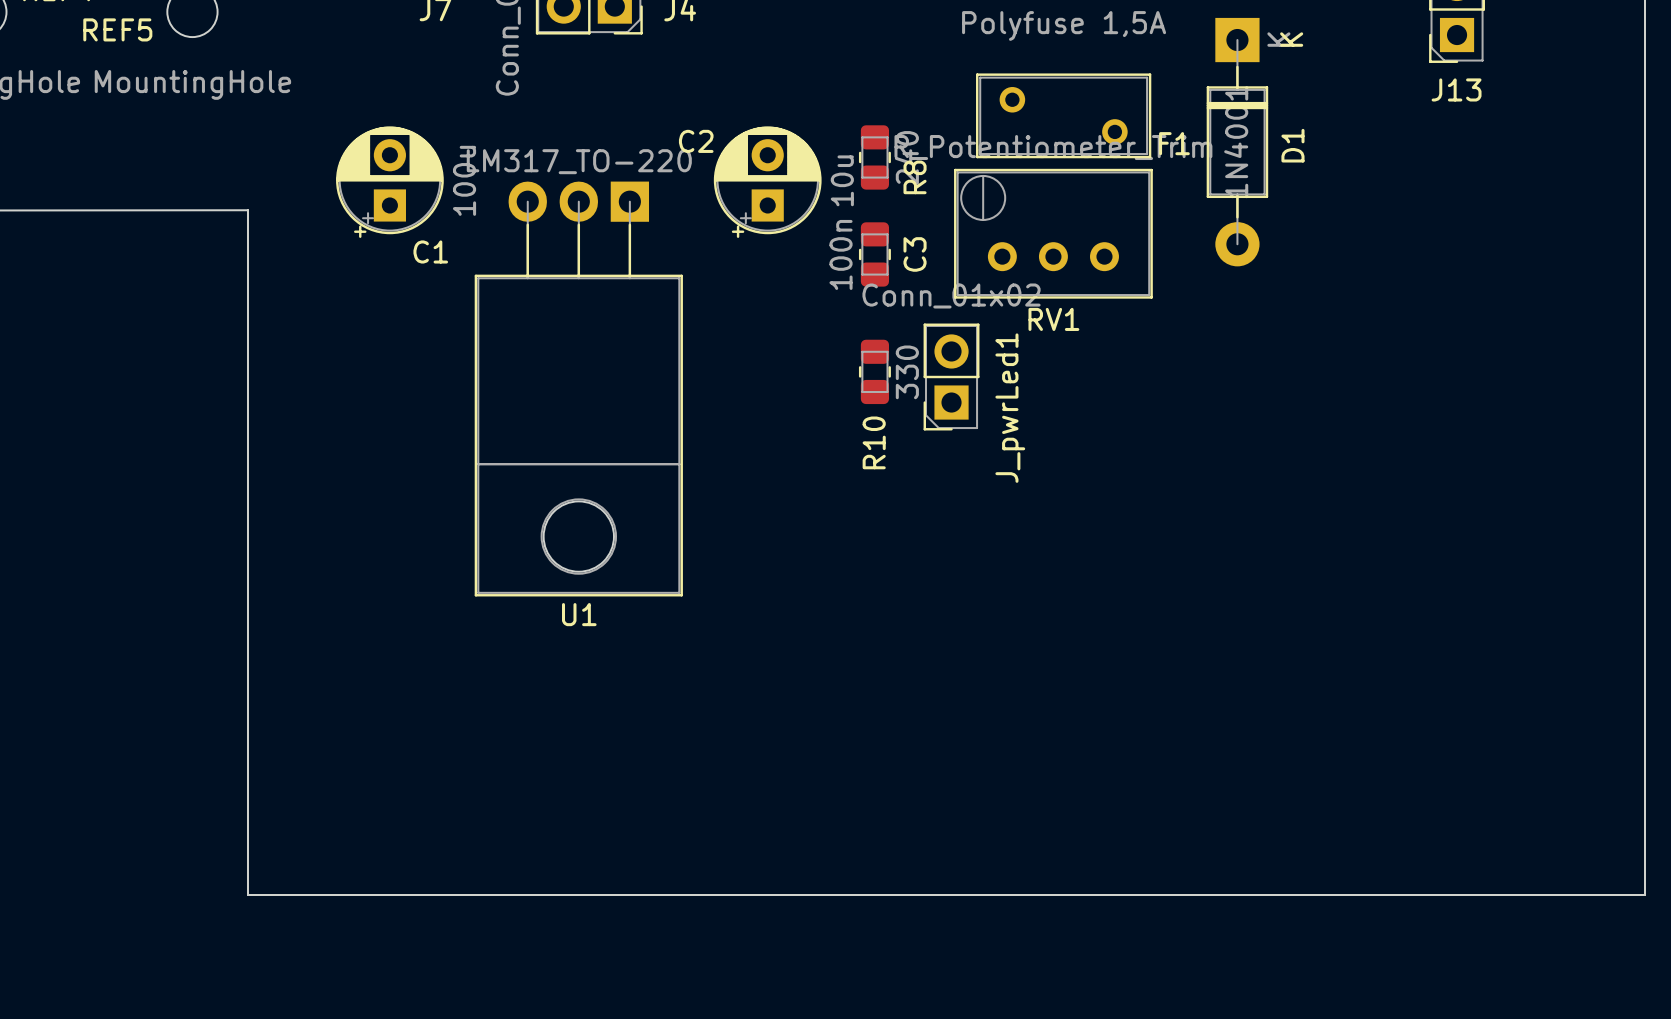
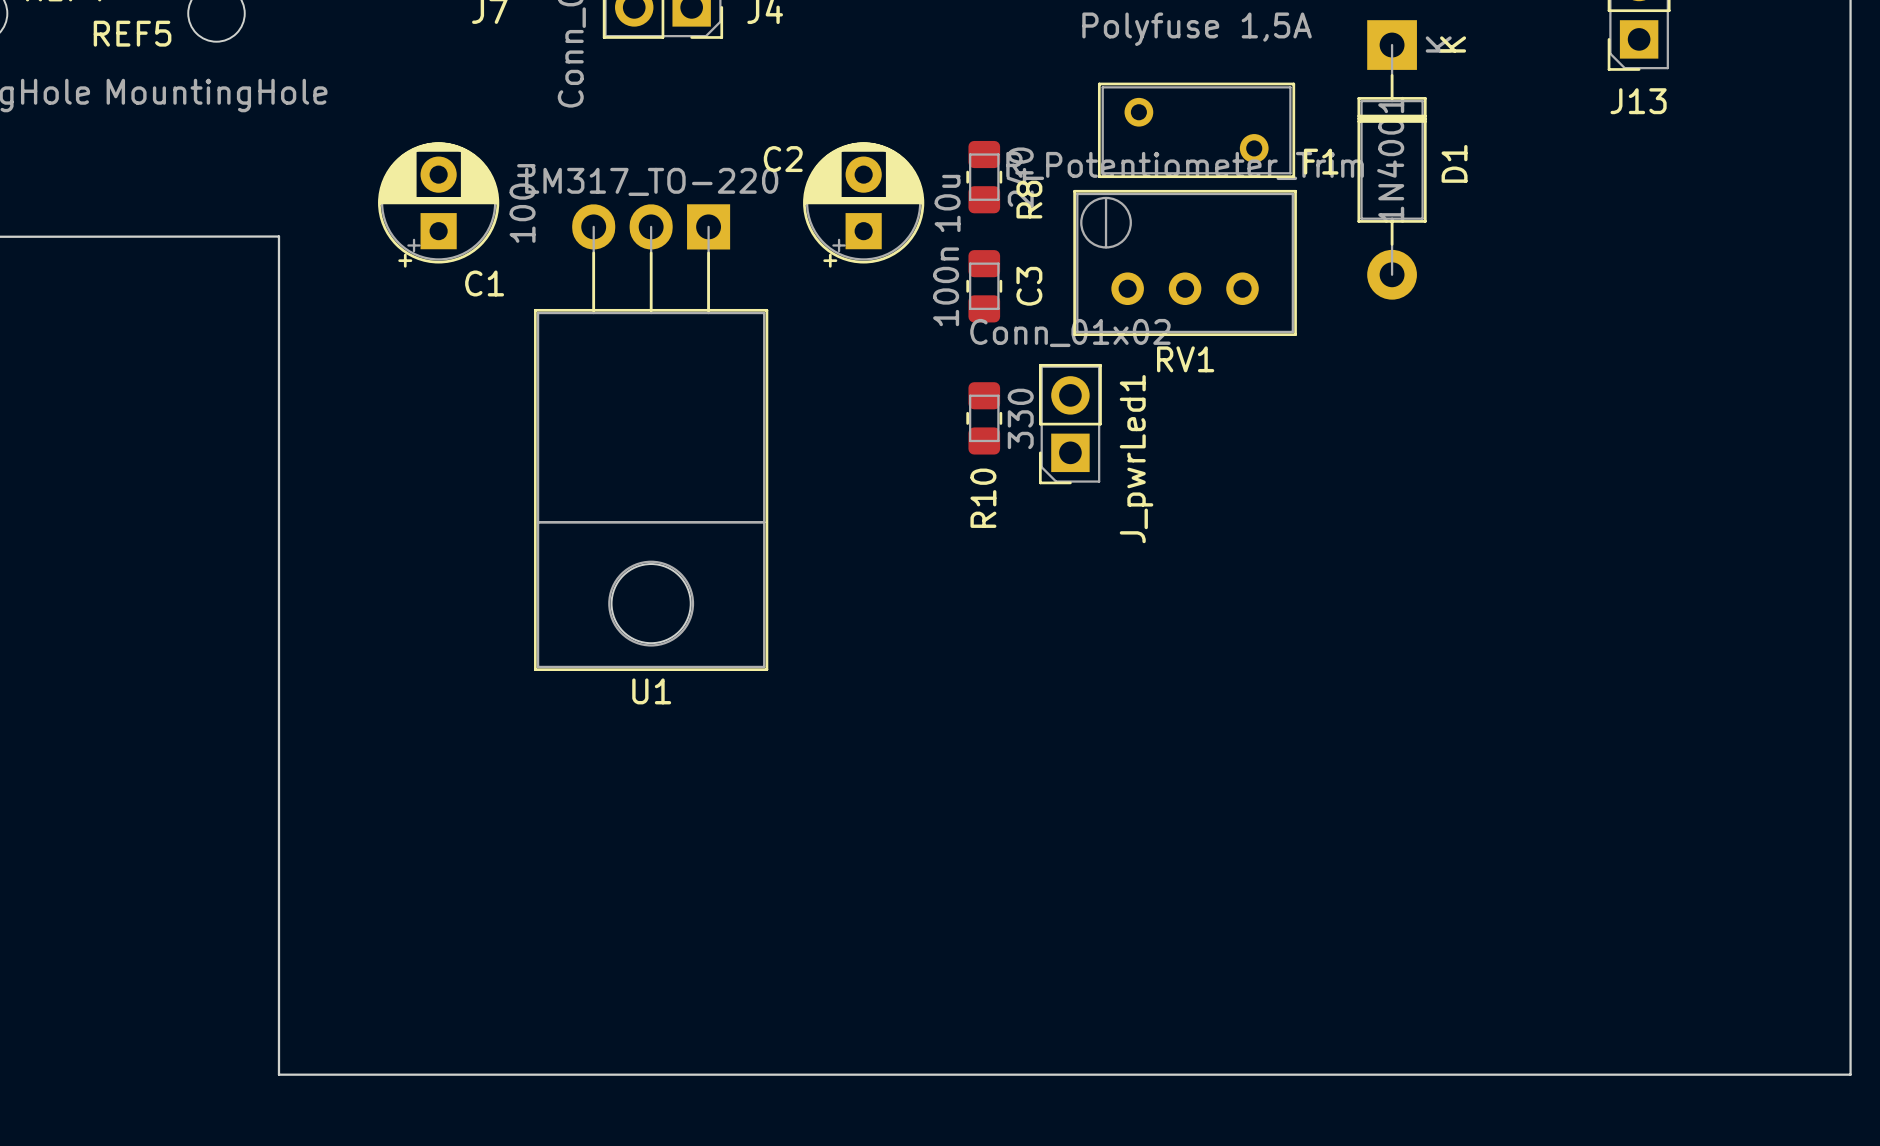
board edge: (247, 894) (1645, 894) -> (278, 1006) (278, 1074) (1850, 1074) (1850, 1006)

